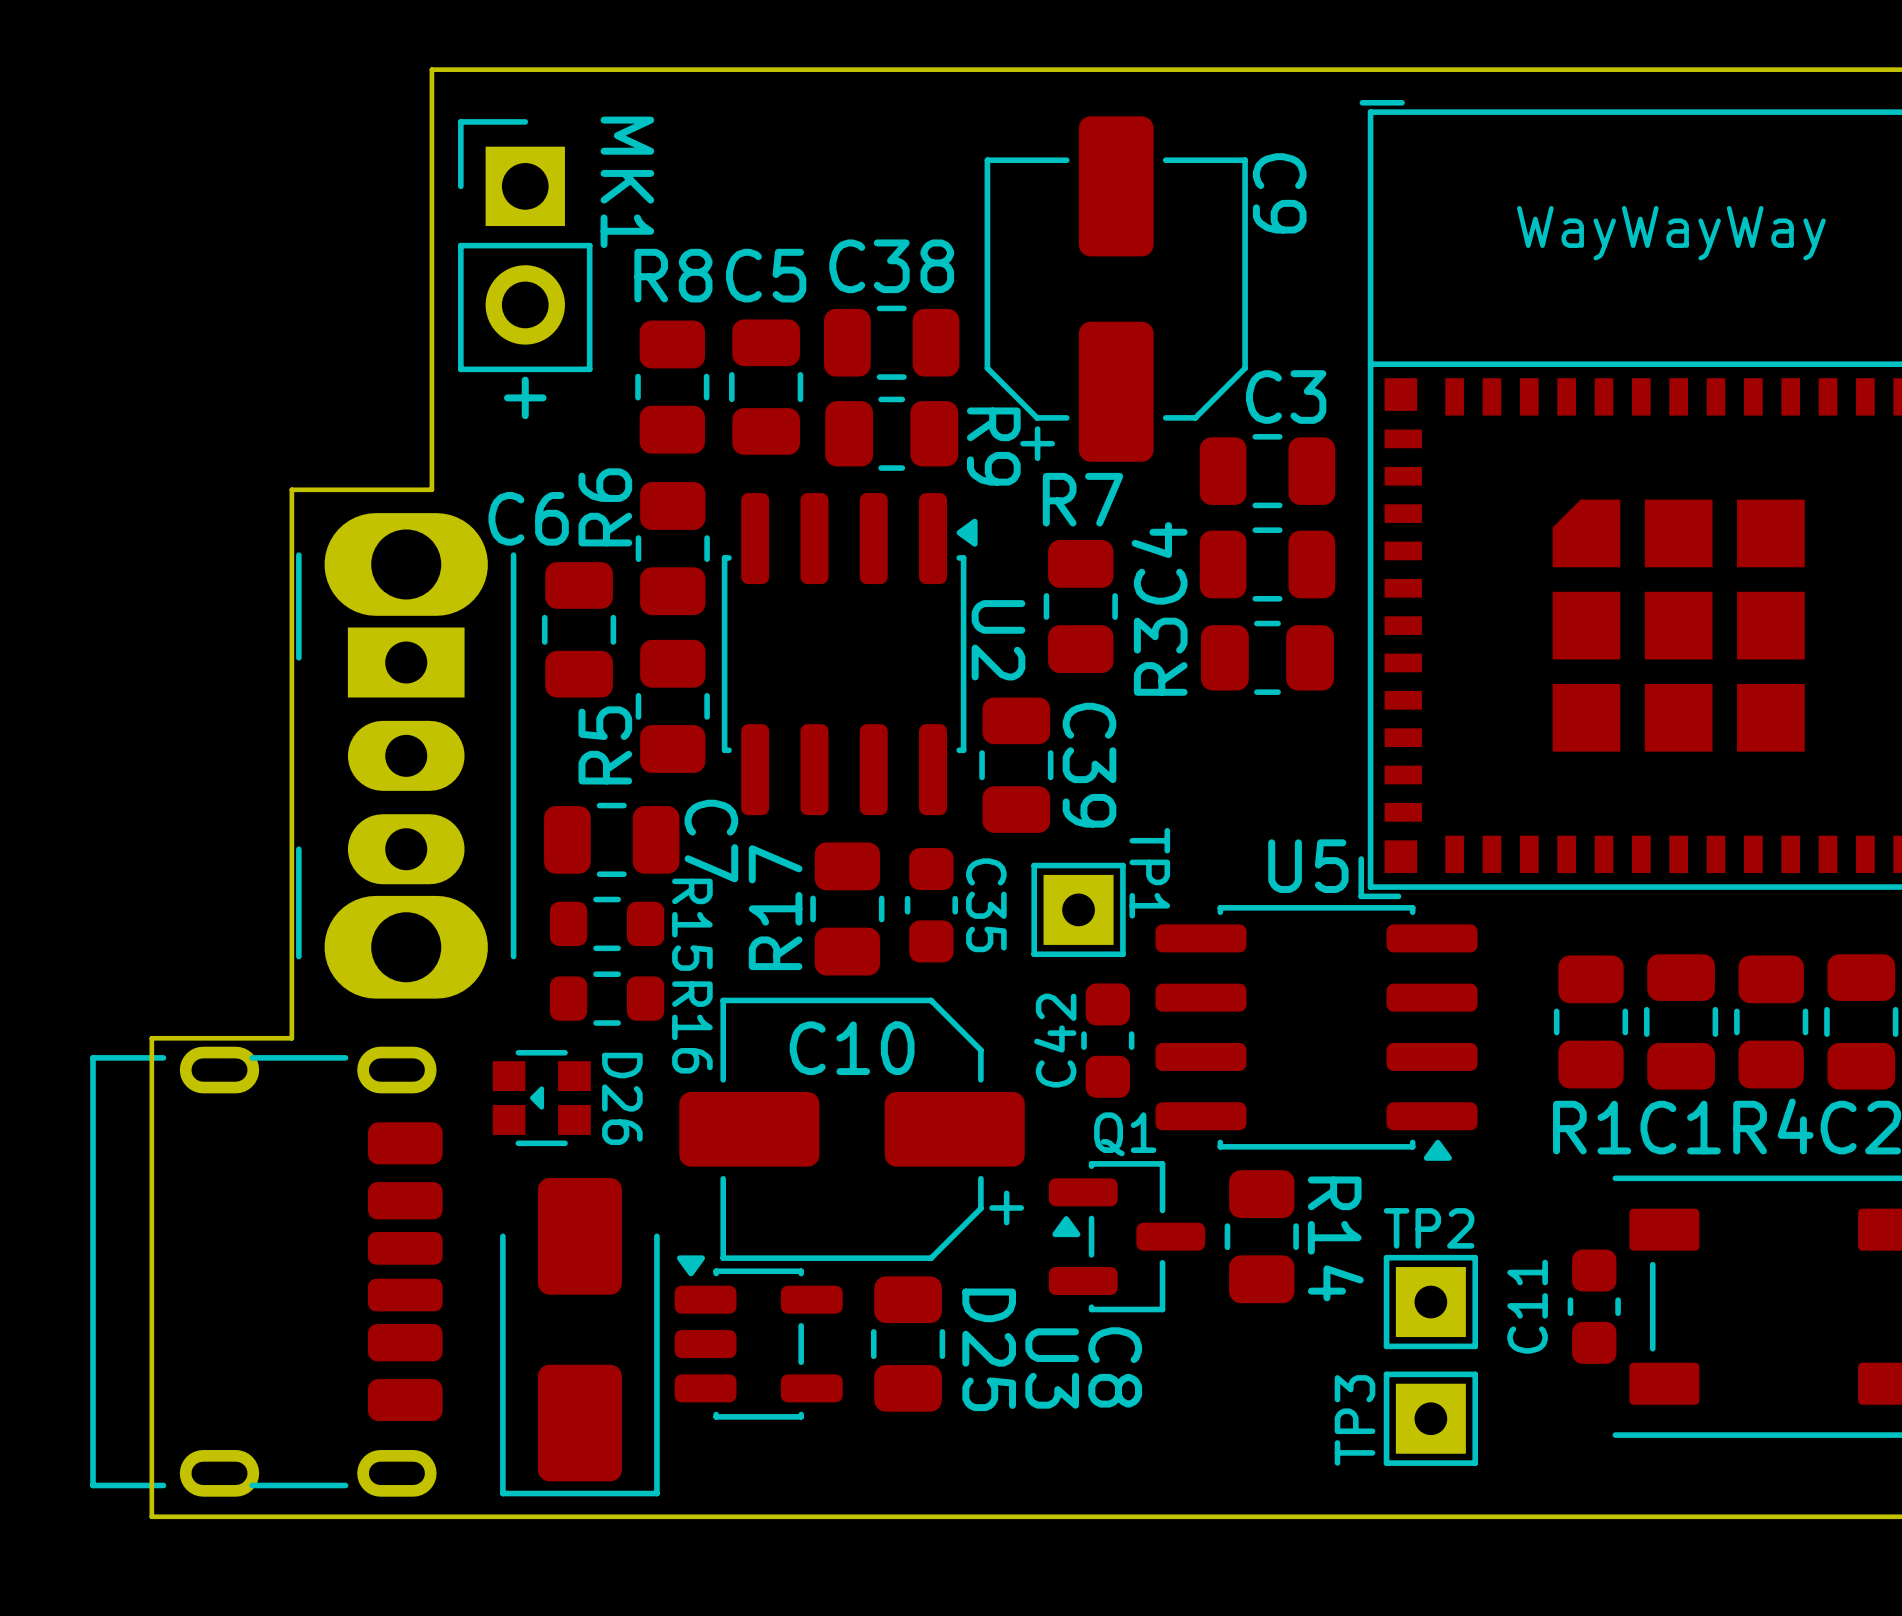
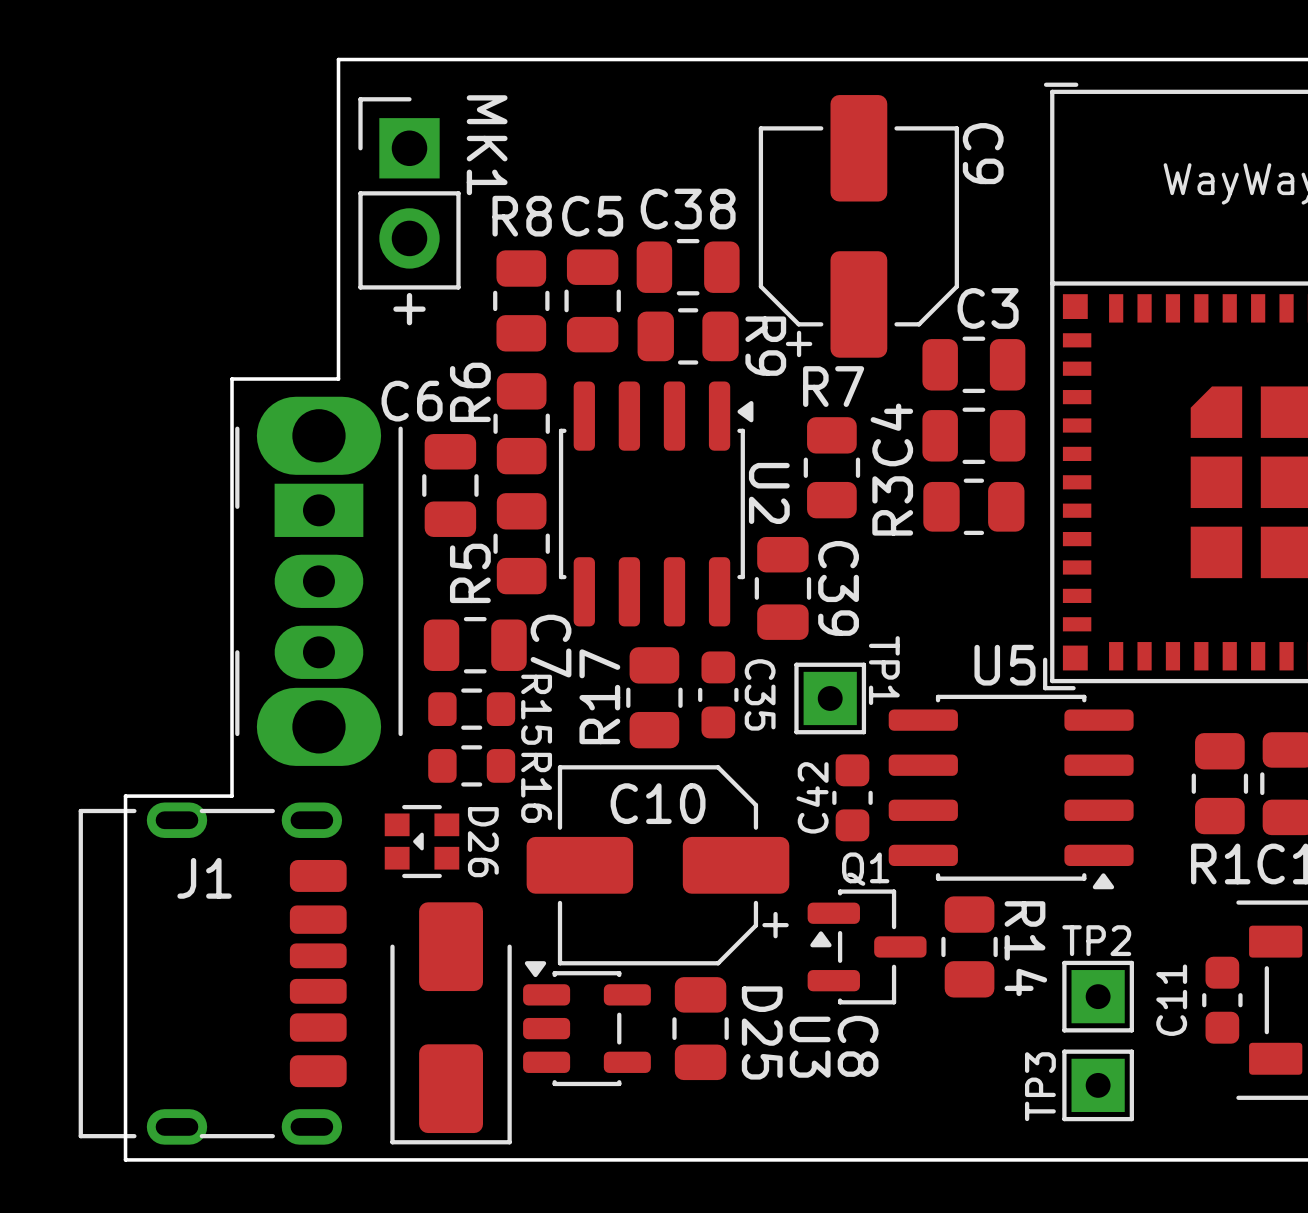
J1 name: none -> J1 (204, 878)

